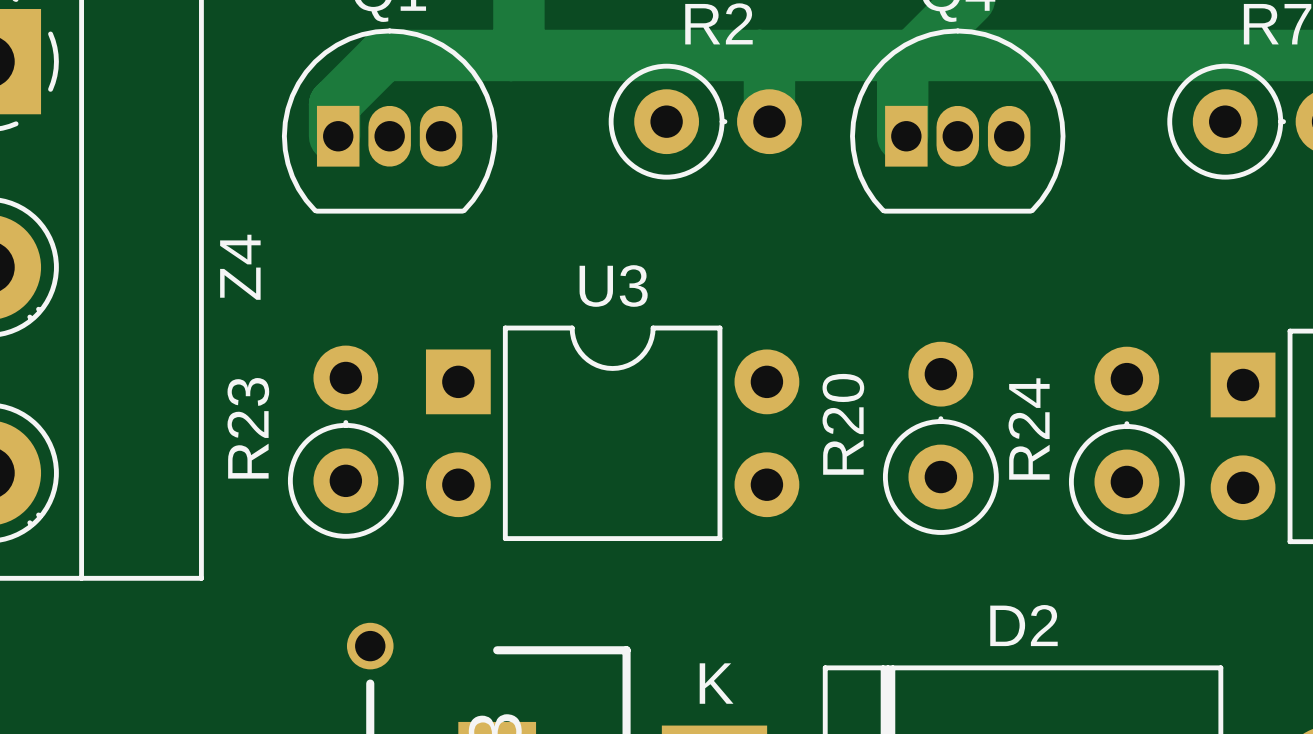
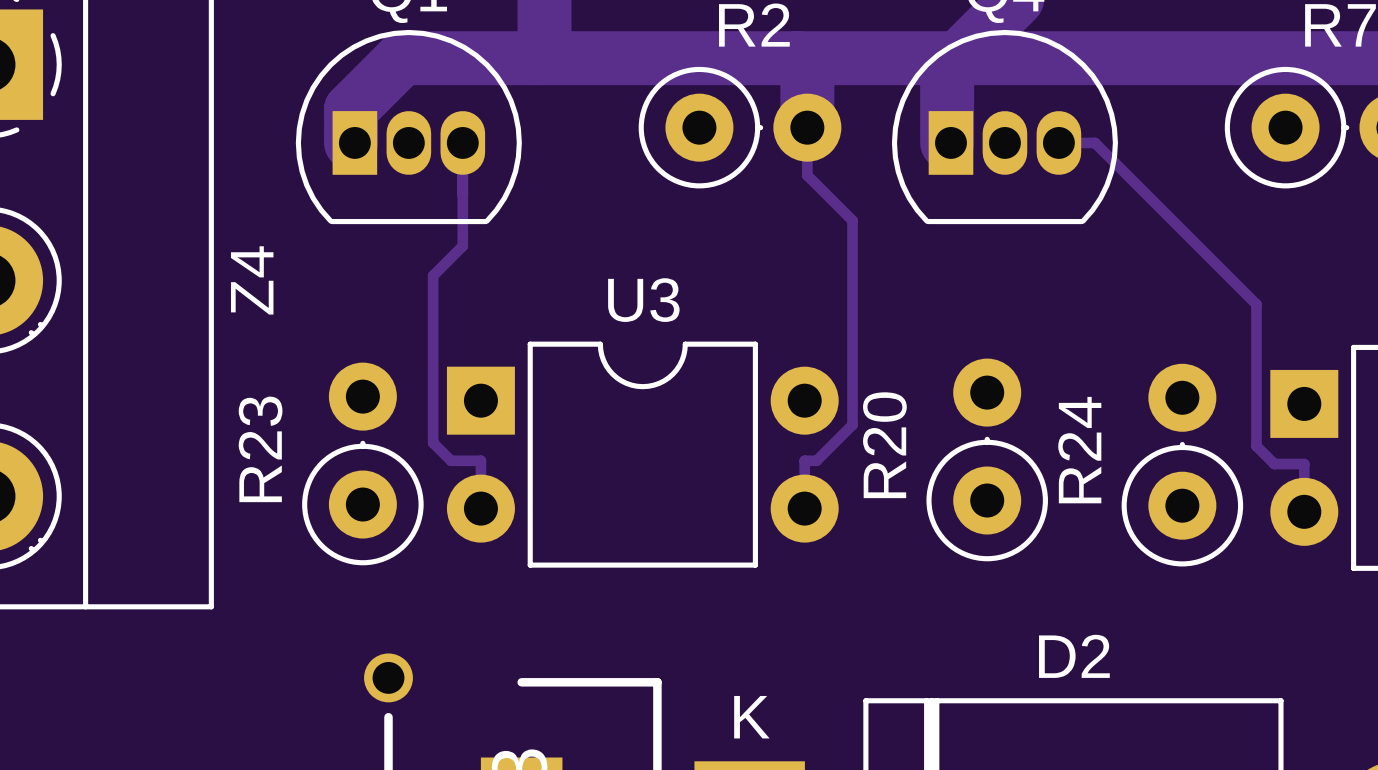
track: none -> (462, 142) (462, 246) (433, 275) (433, 442) (451, 460) (480, 460) (480, 508)
track: none -> (1058, 142) (1095, 142) (1256, 304) (1256, 446) (1274, 464) (1304, 464) (1304, 487)
track: none -> (807, 151) (807, 175) (852, 220) (852, 424) (816, 460) (804, 460) (804, 508)

